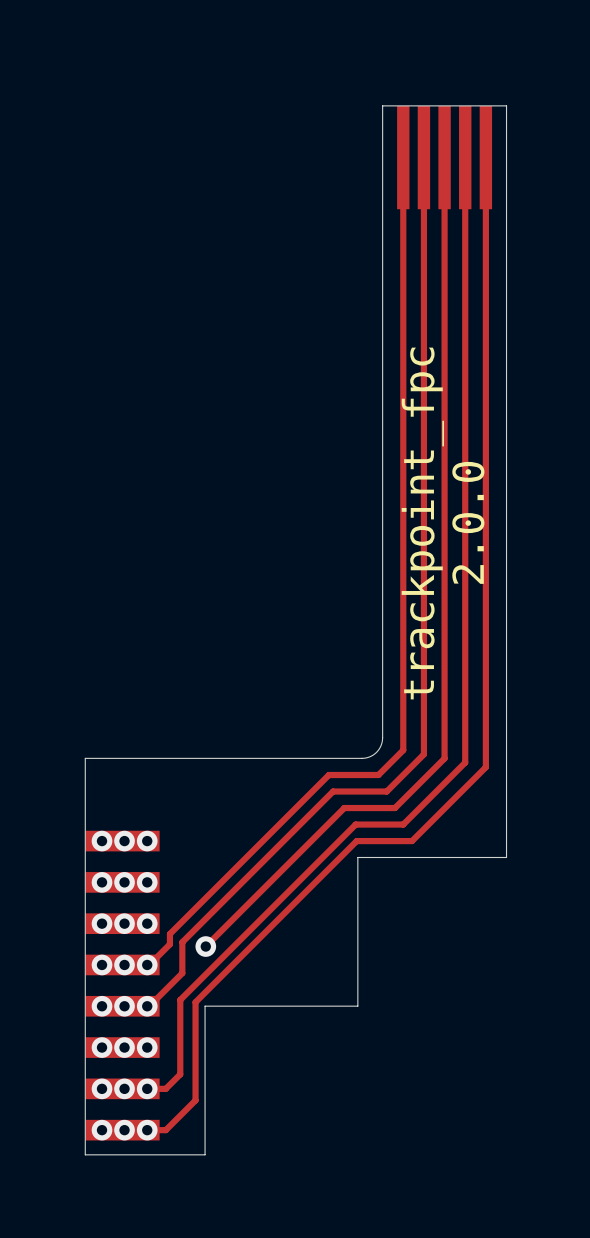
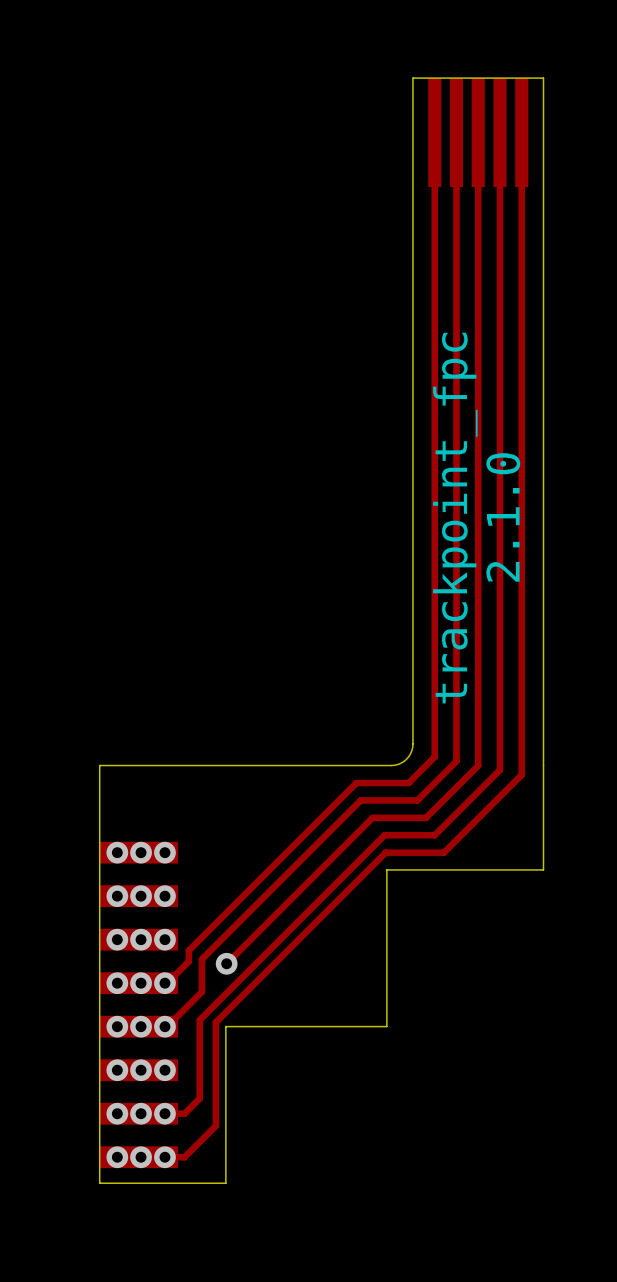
text: 2.0.0 (468, 522) -> 2.1.0 (503, 517)

